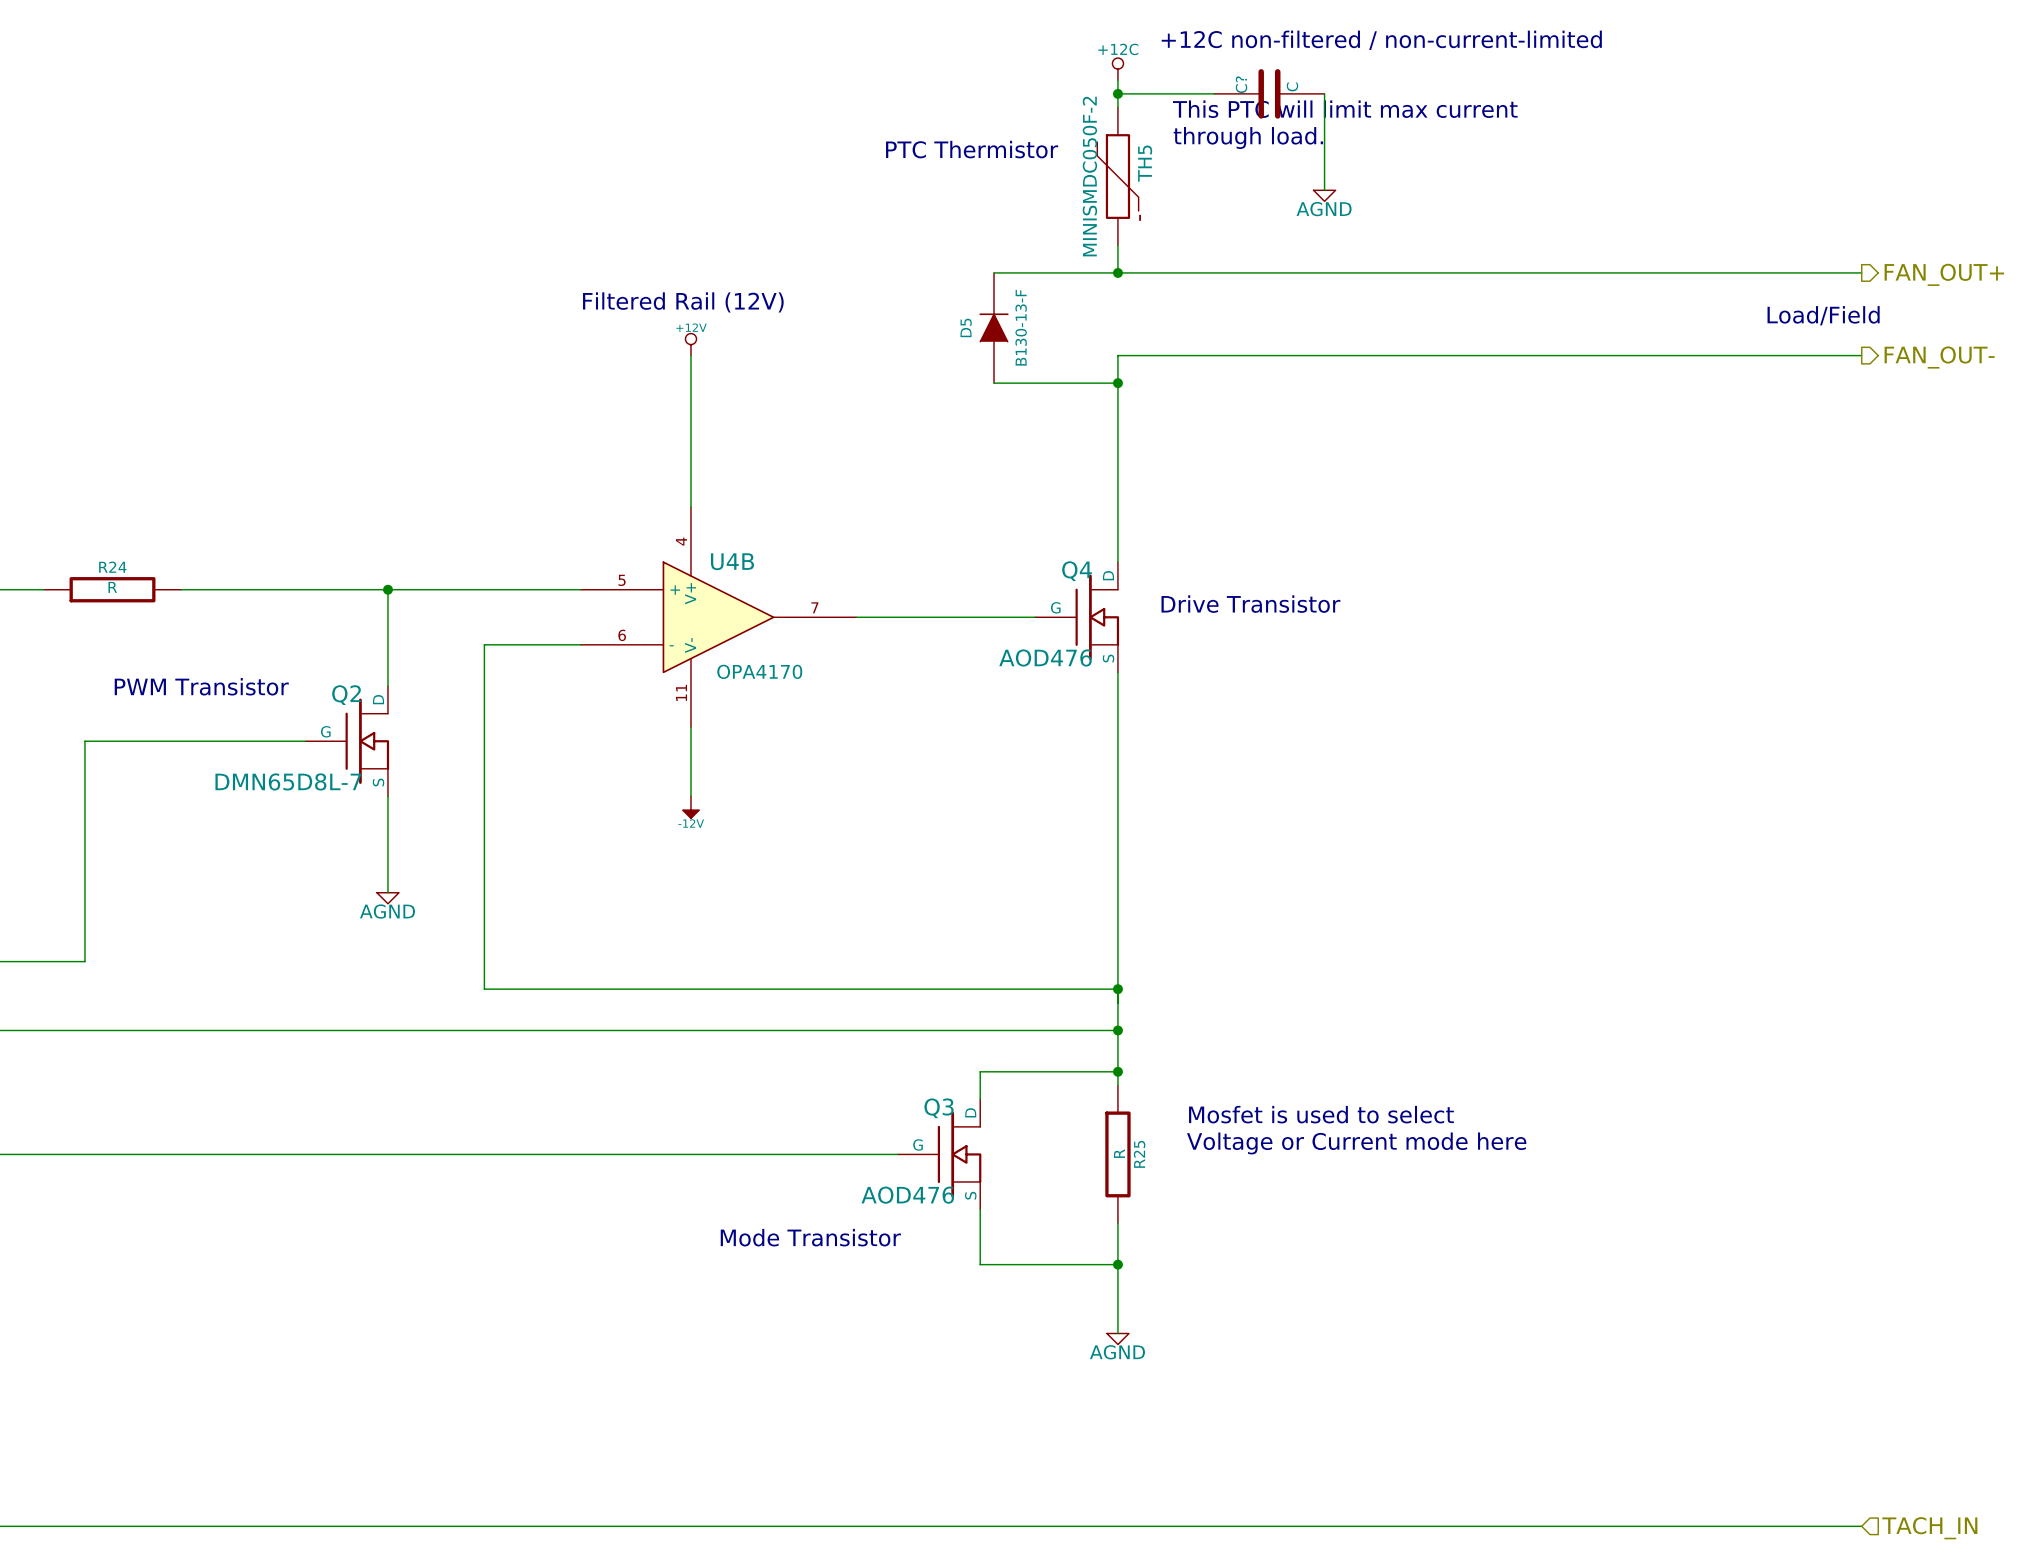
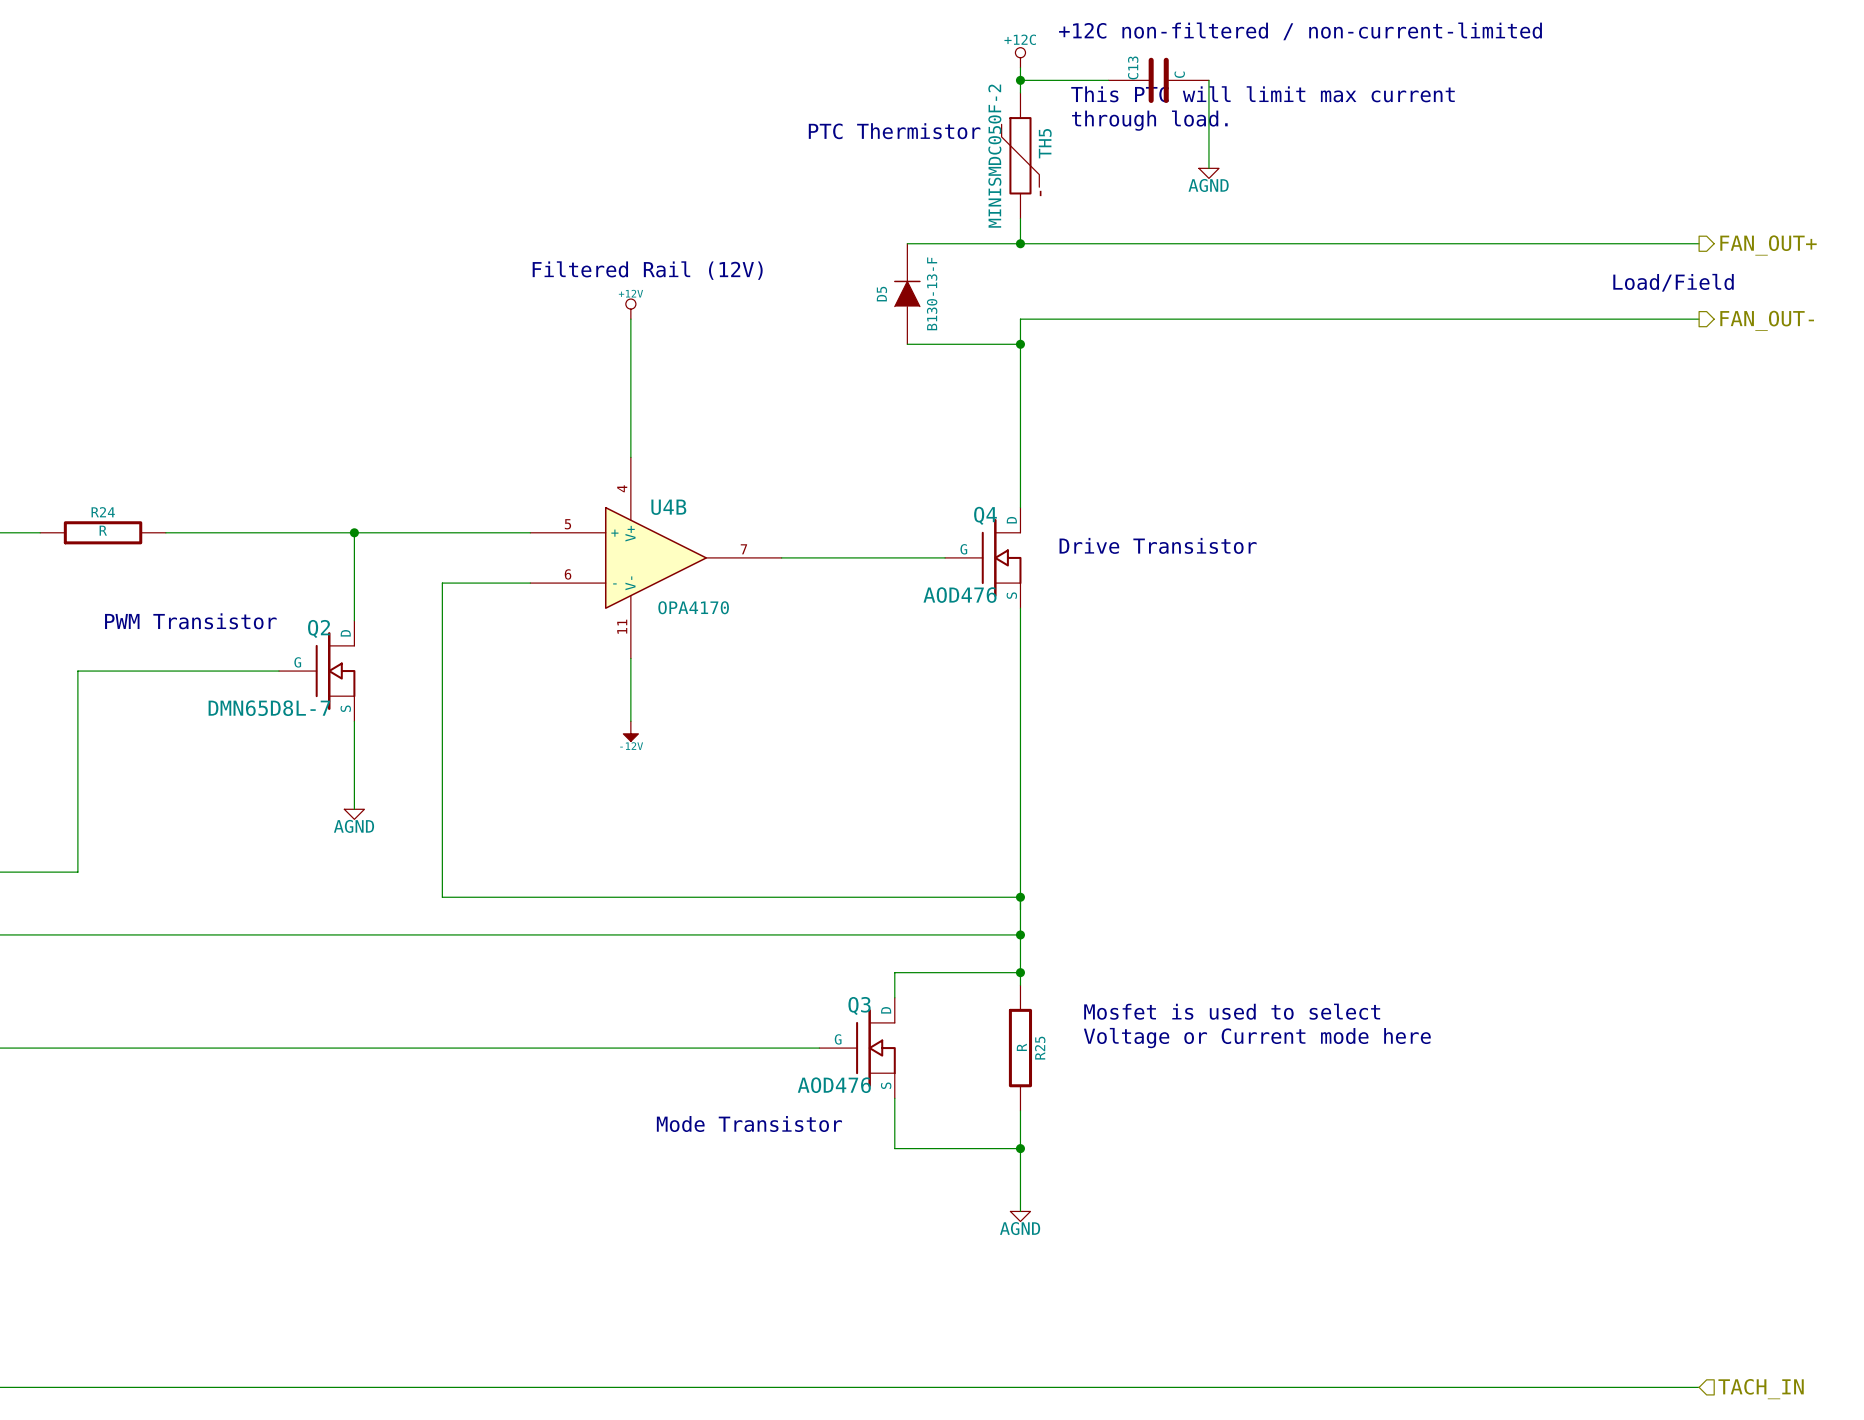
C? name: C? (1241, 84) -> C13 (1133, 67)

